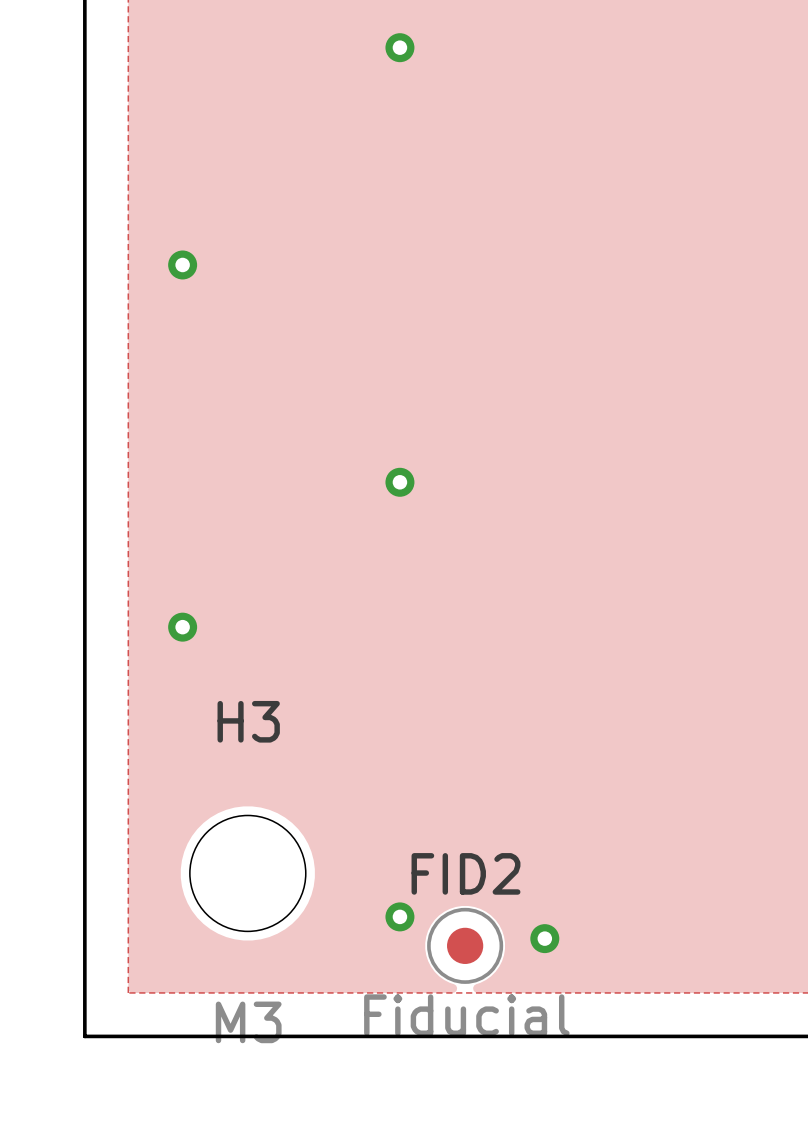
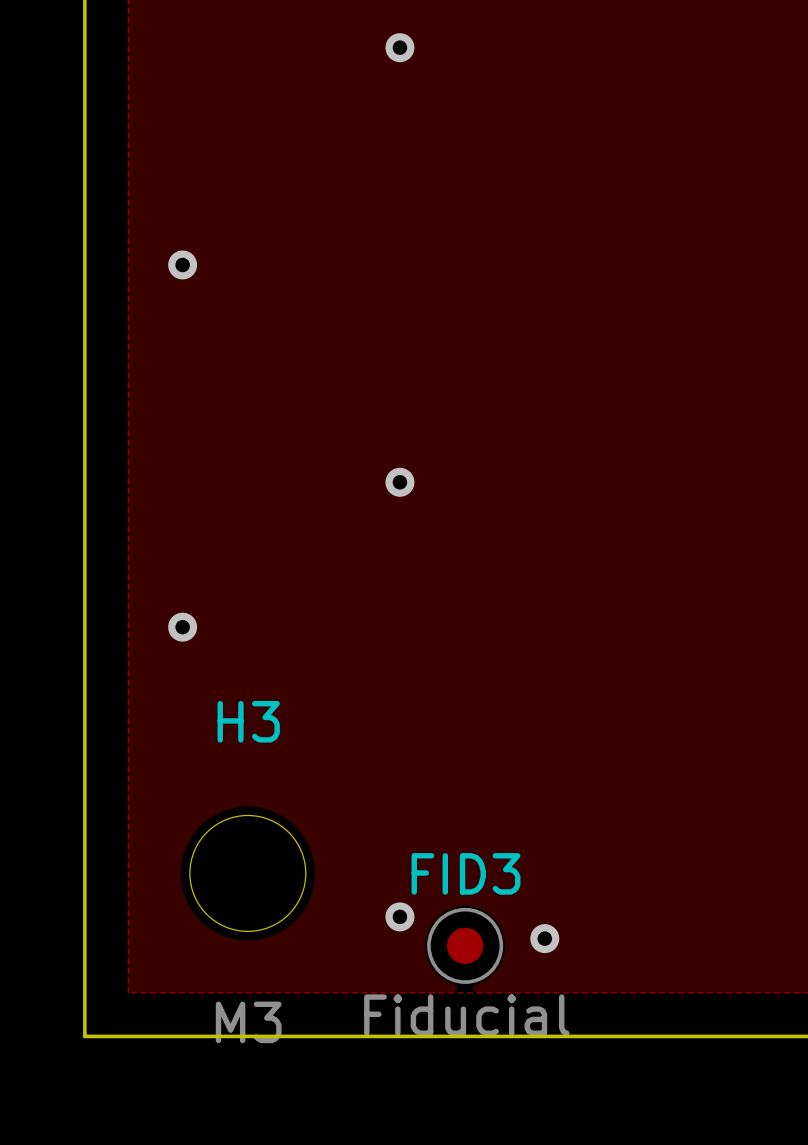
FID2 name: FID2 (465, 873) -> FID3 (465, 873)

